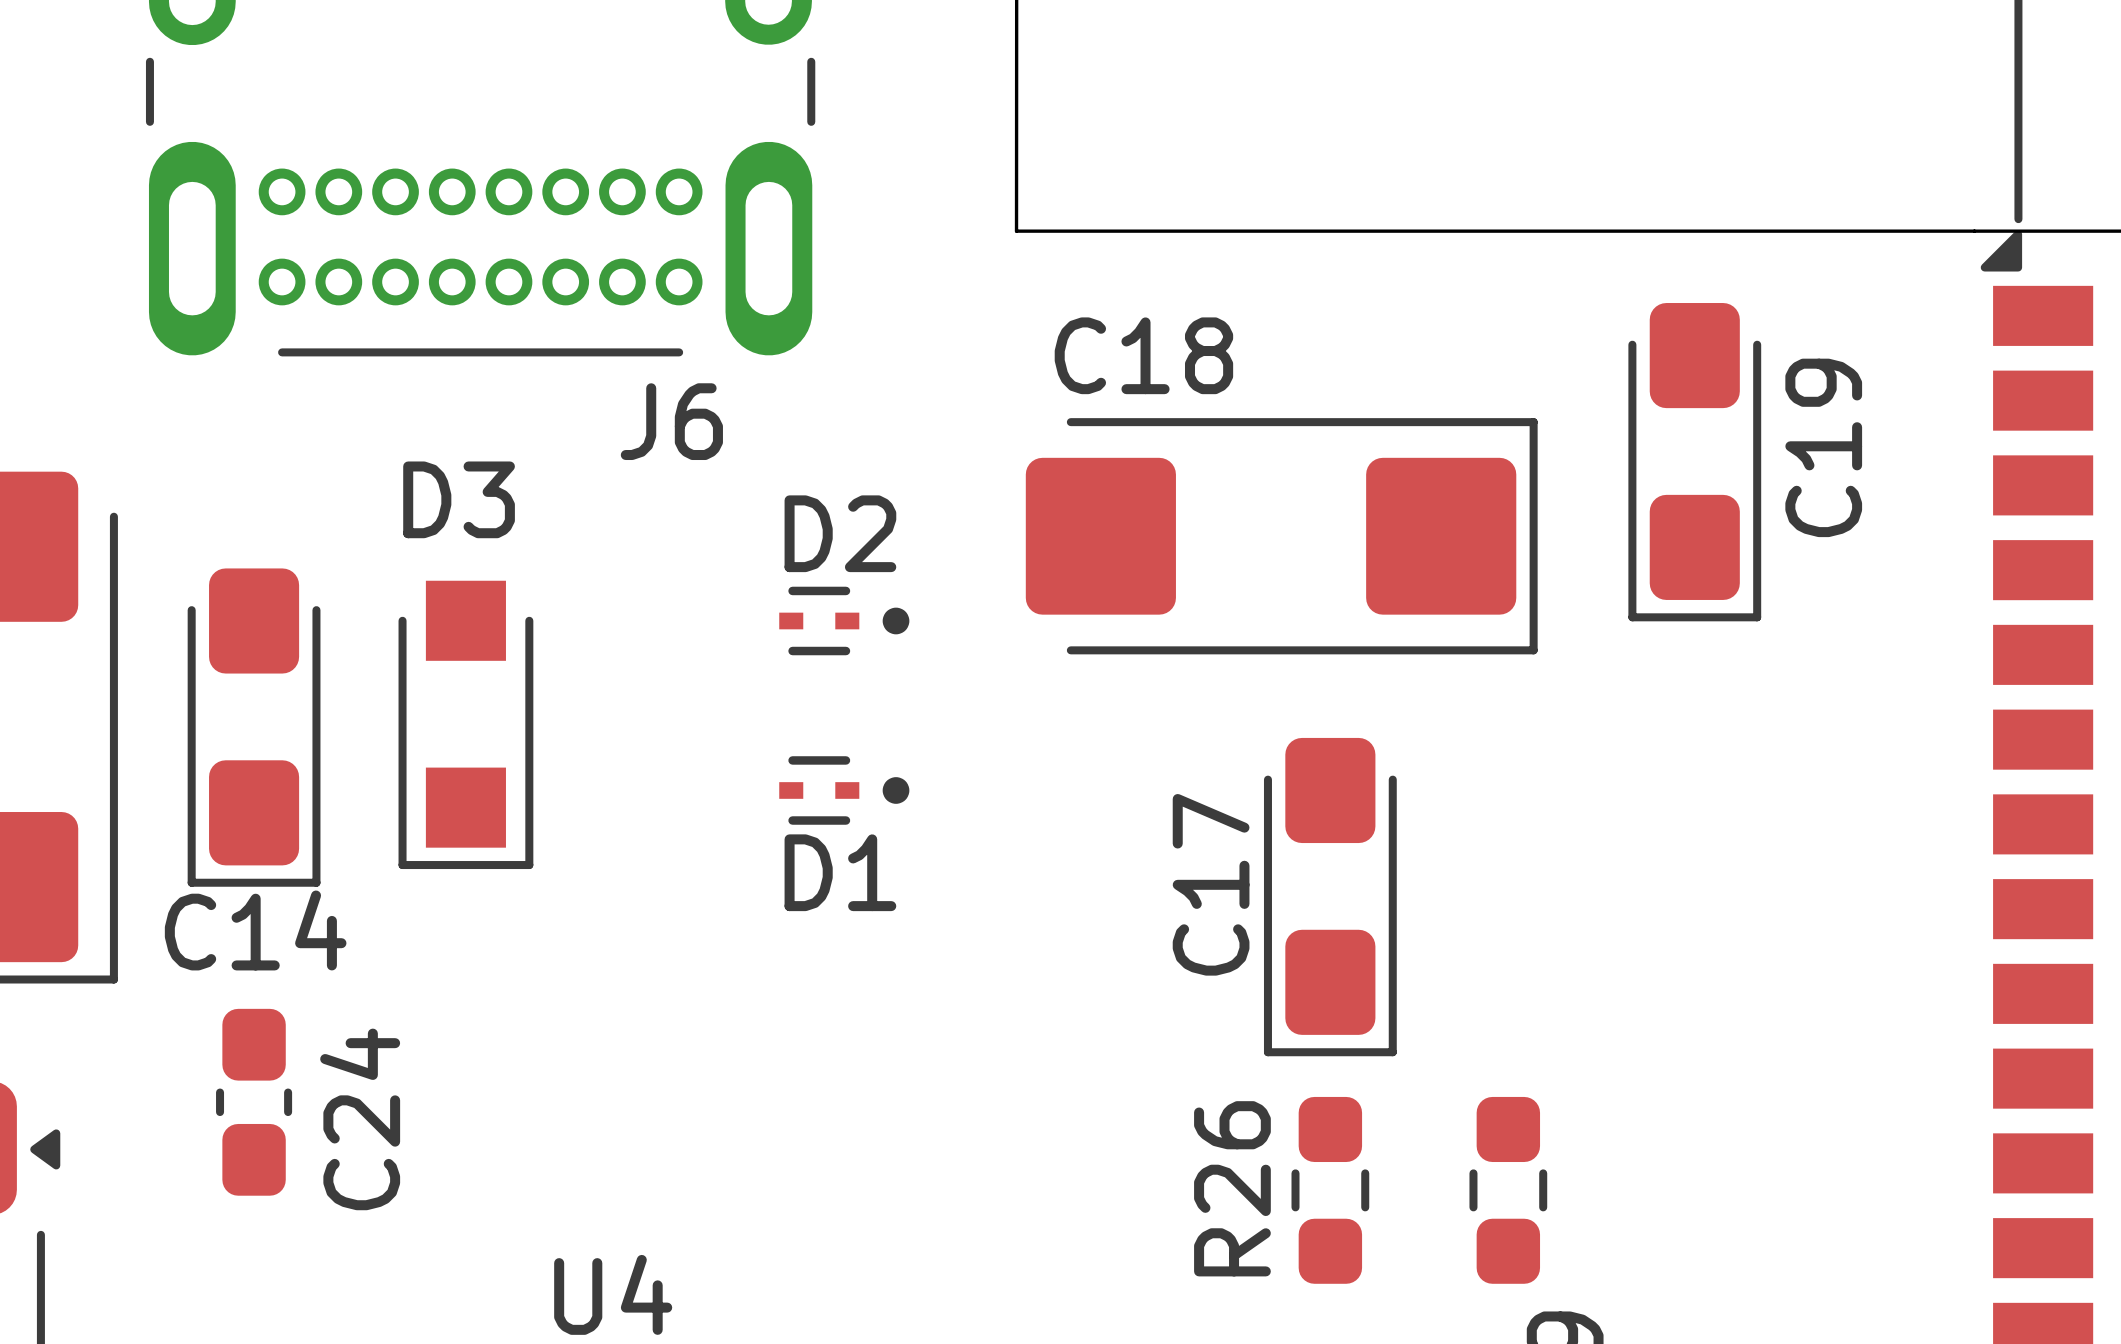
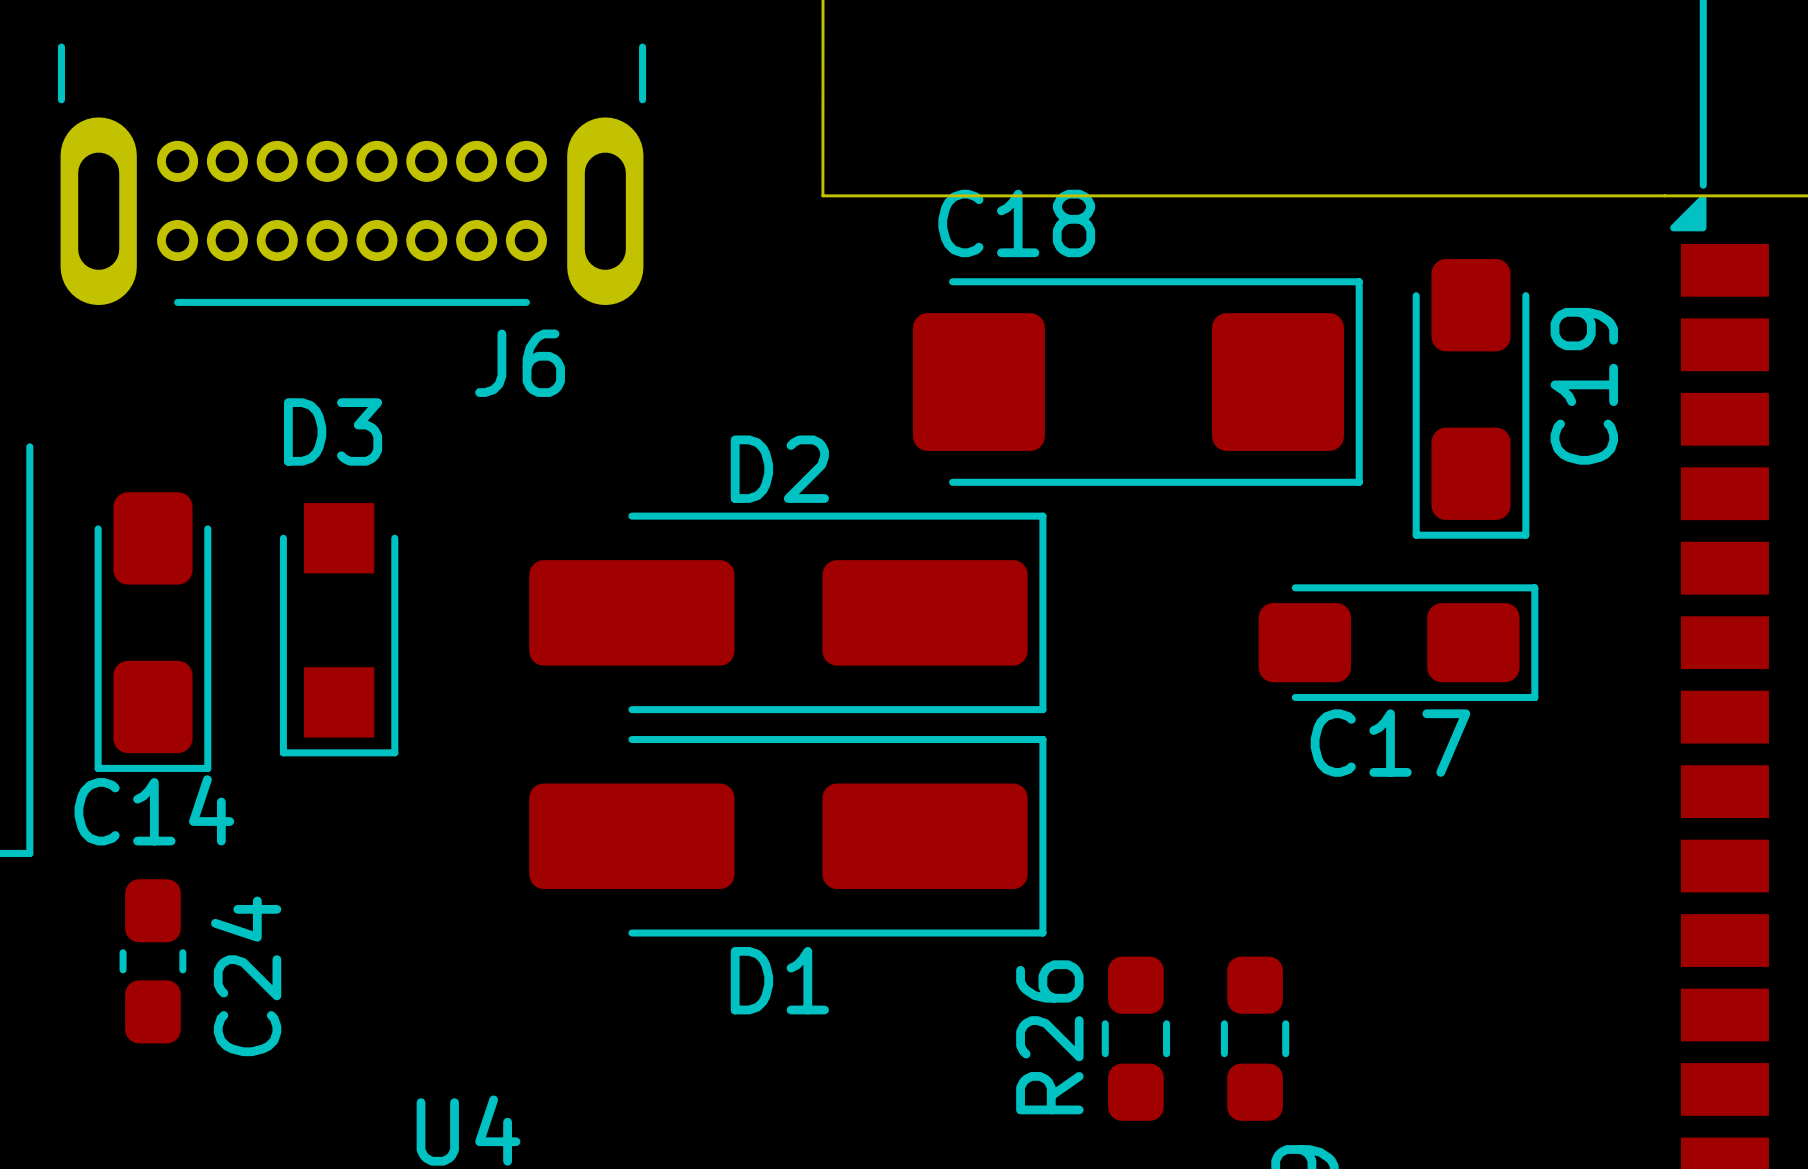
C19 position: (1694, 462) -> (1471, 398)
C18 position: (1281, 536) -> (1137, 382)
D2 footprint: [779, 586, 910, 656] -> [529, 512, 1047, 714]
D1 footprint: [779, 756, 910, 825] -> [529, 736, 1047, 937]
C17 rotation: 0° (1330, 897) -> 90° counterclockwise (1398, 642)
C17 position: (1330, 897) -> (1398, 642)
R26 position: (1330, 1190) -> (1135, 1038)

